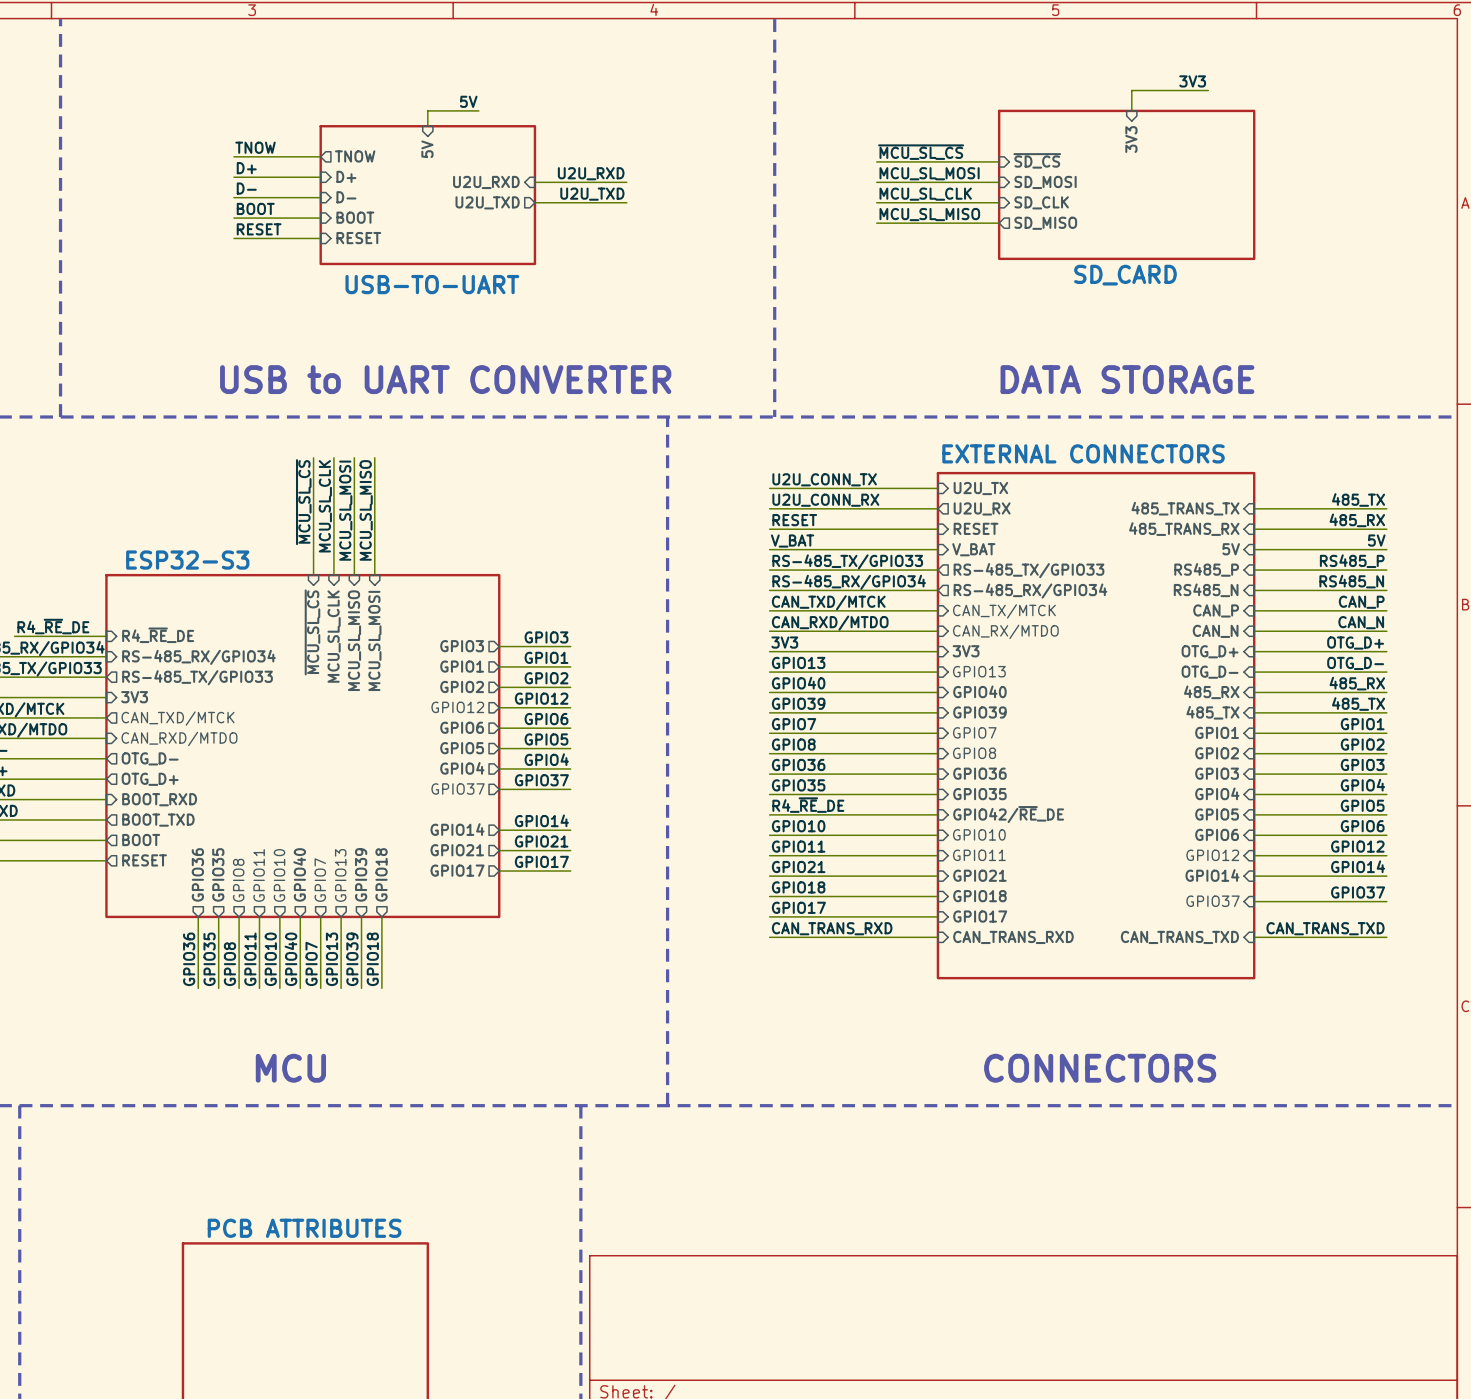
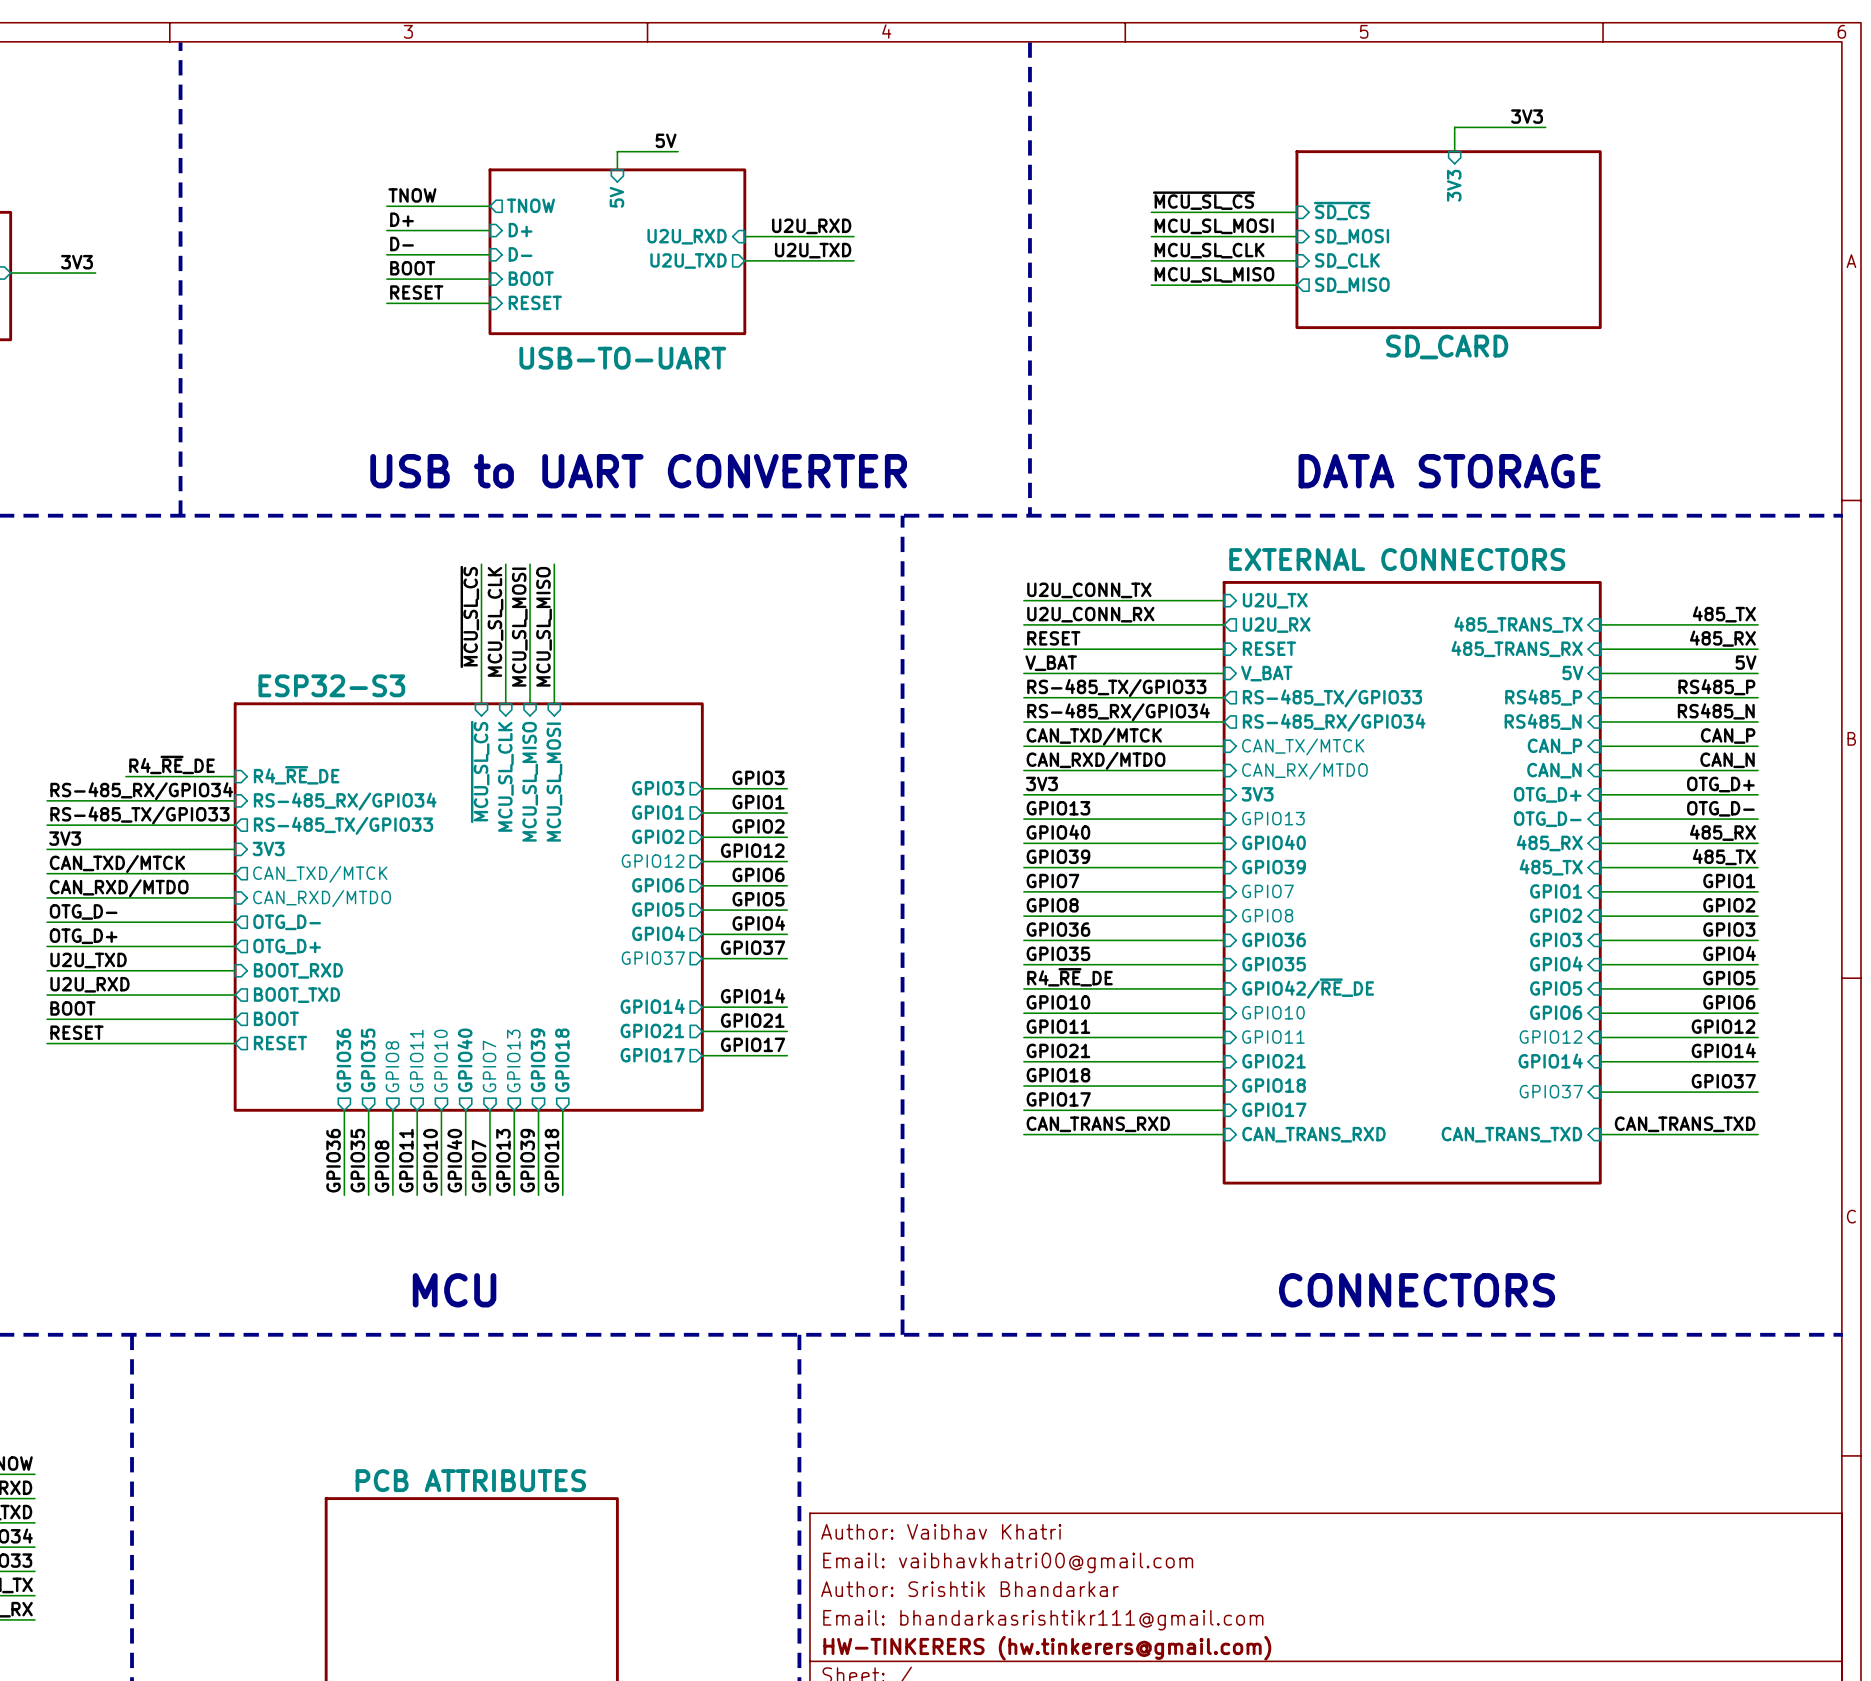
title block: none -> Author: Vaibhav Khatri (941, 1531)
title block: none -> Email: vaibhavkhatri00@gmail.com (1008, 1562)
title block: none -> Author: Srishtik Bhandarkar (969, 1589)
title block: none -> Email: bhandarkasrishtikr111@gmail.com (1043, 1620)
title block: none -> HW-TINKERERS (hw.tinkerers@gmail.com) (1047, 1648)

